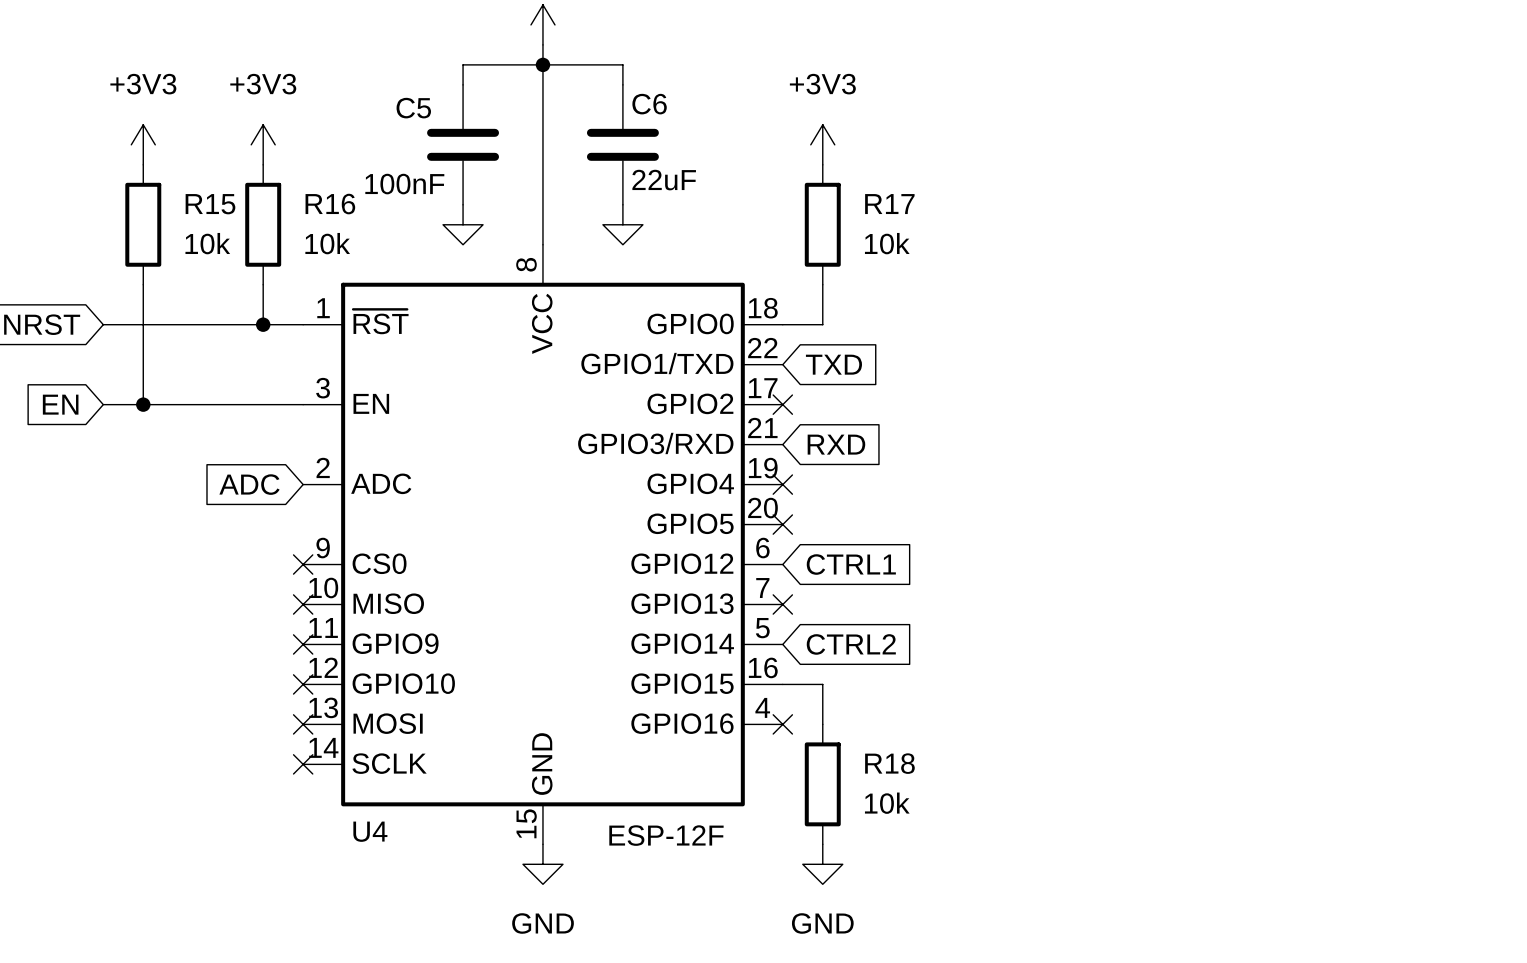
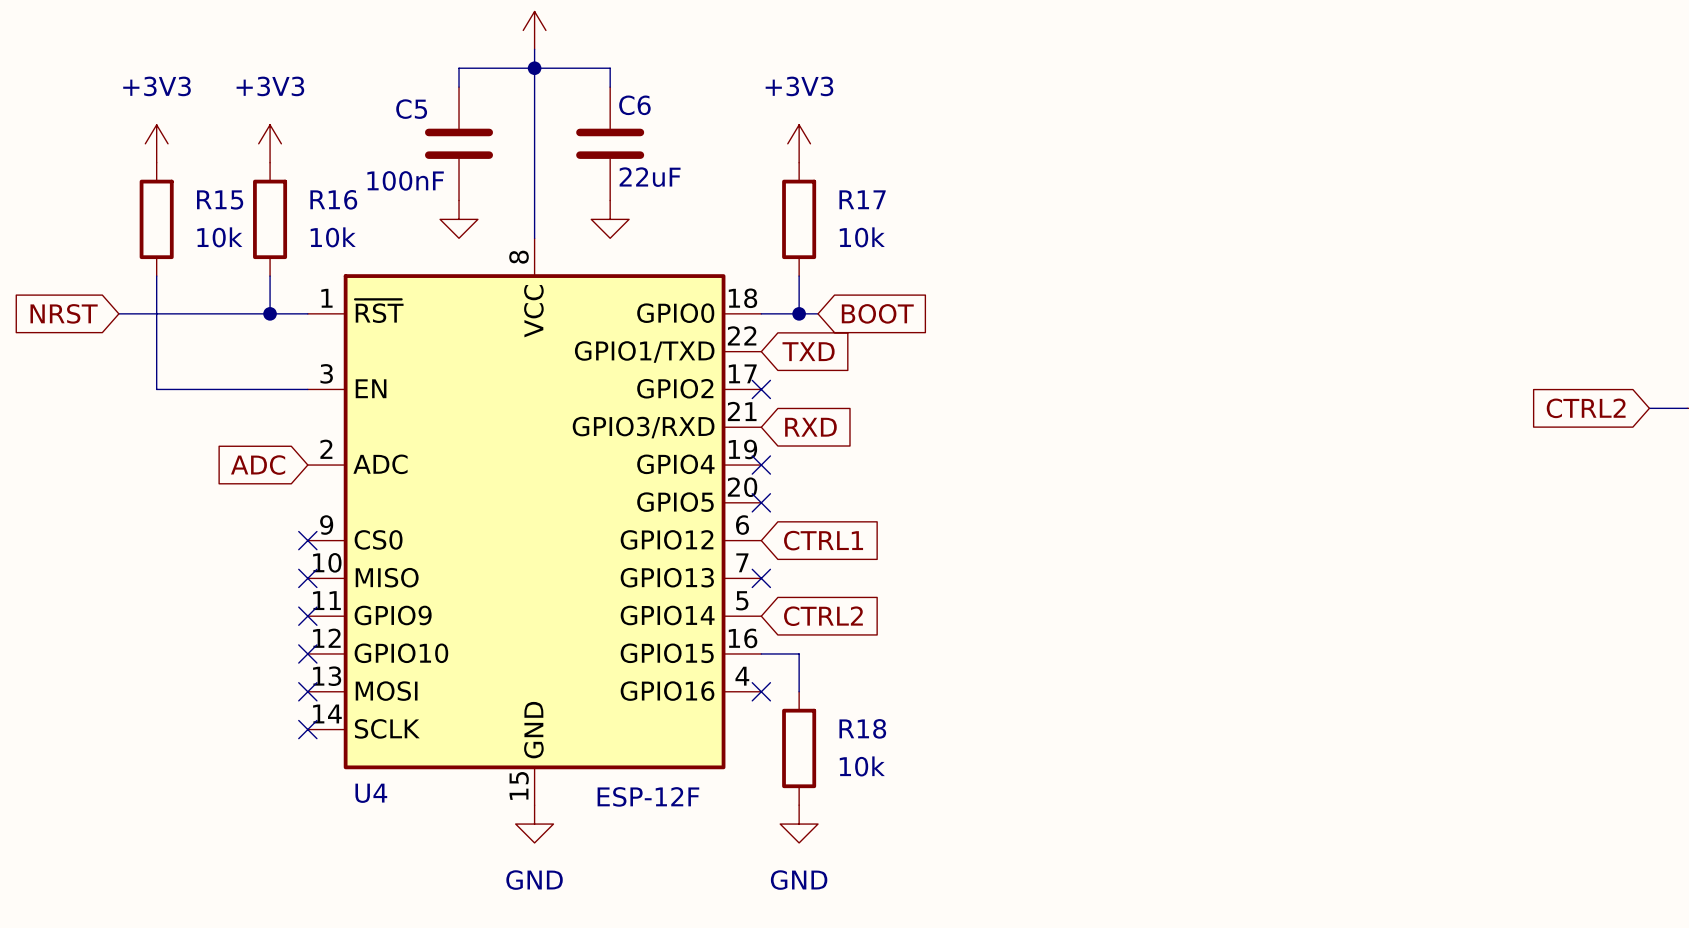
wire: none -> (799, 313) (818, 313)
junction: none -> (799, 313)
global label: none -> BOOT (877, 313)
global label: EN (60, 404) -> none
wire: (103, 404) (143, 404) -> none
junction: (143, 404) -> none

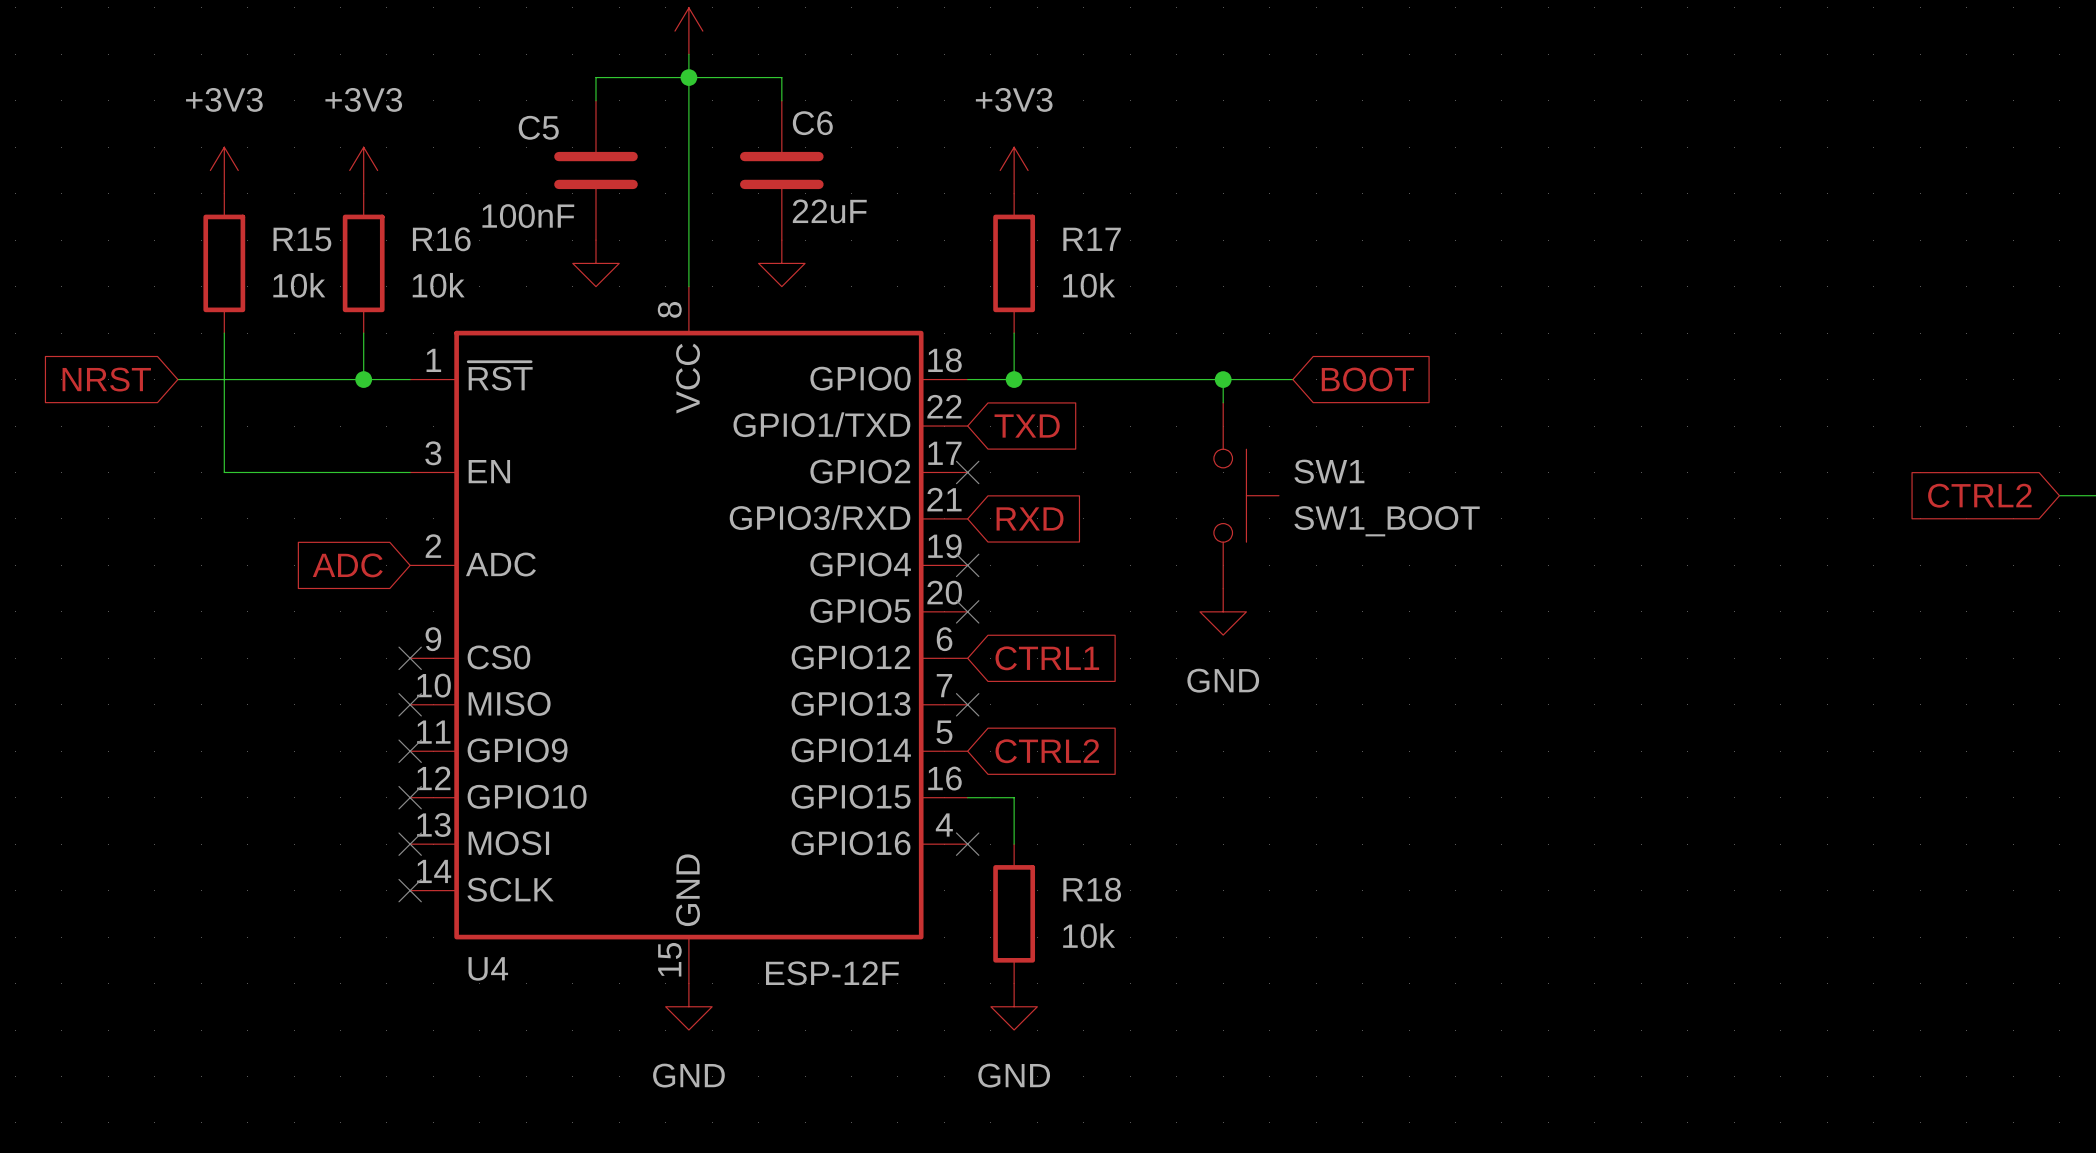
wire: none -> (1037, 379) (1292, 379)
global label position: BOOT (877, 313) -> BOOT (1367, 379)
wire: none -> (1223, 379) (1223, 402)
junction: none -> (1223, 379)
SW1: none -> SW1_BOOT (1246, 495)
power symbol: none -> GND (1223, 611)

